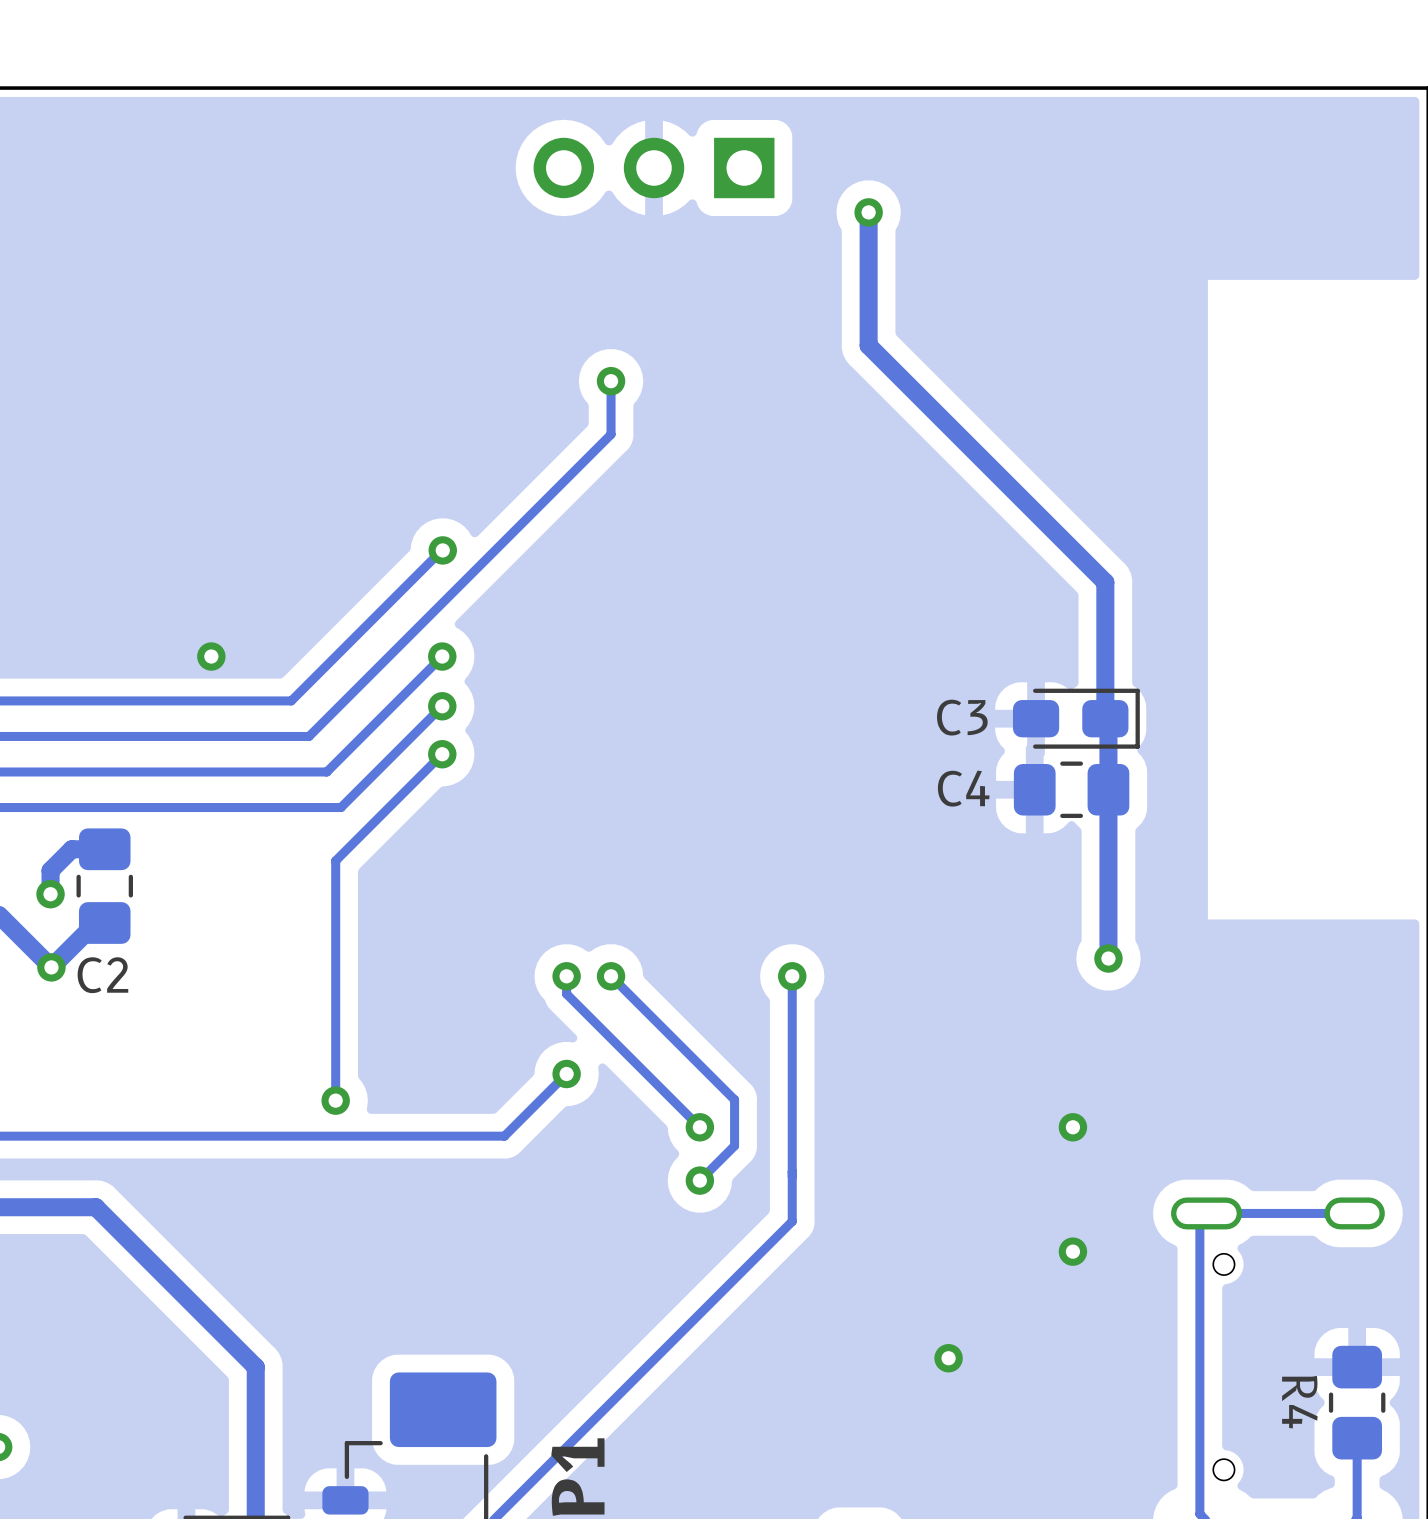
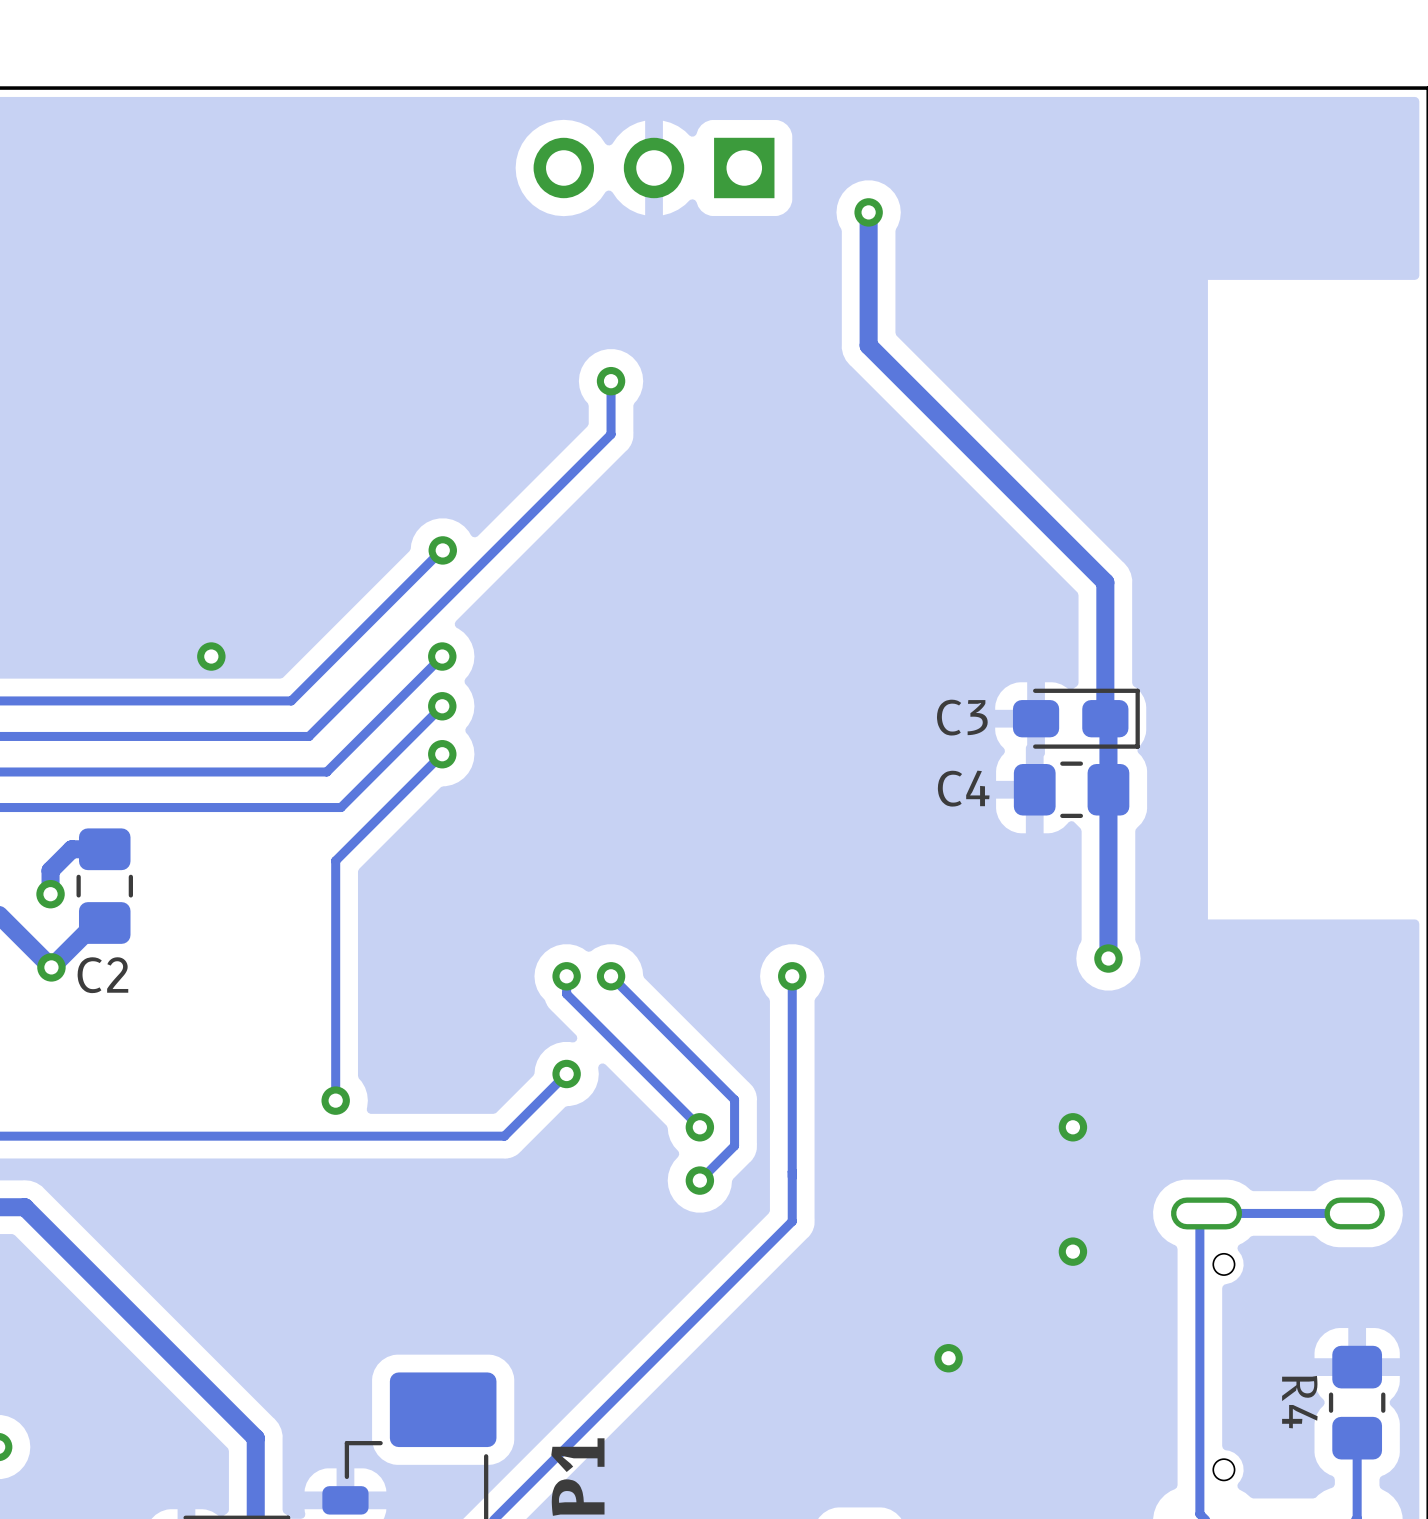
track: (24, 1207) (95, 1207) (255, 1367) (255, 1438) -> (24, 1207) (255, 1438)

